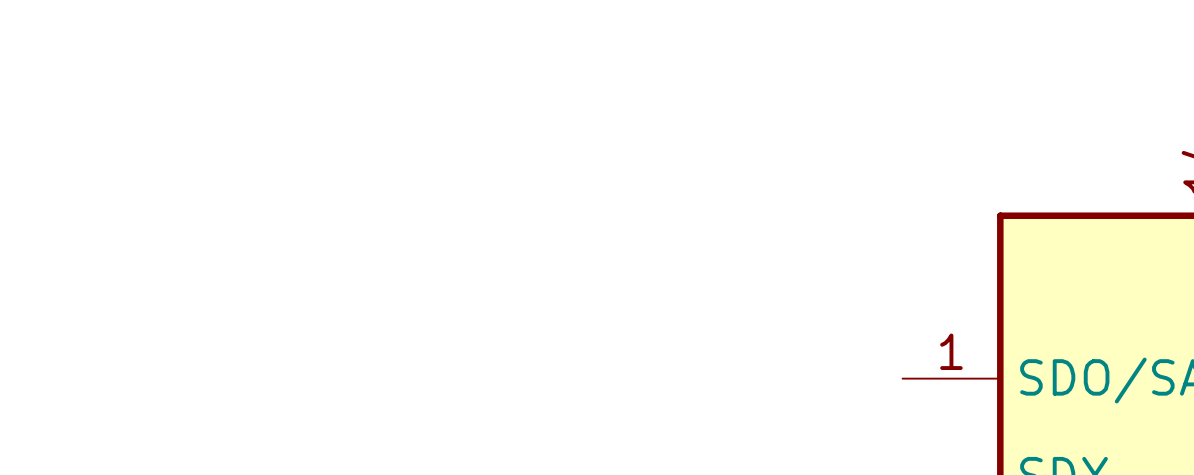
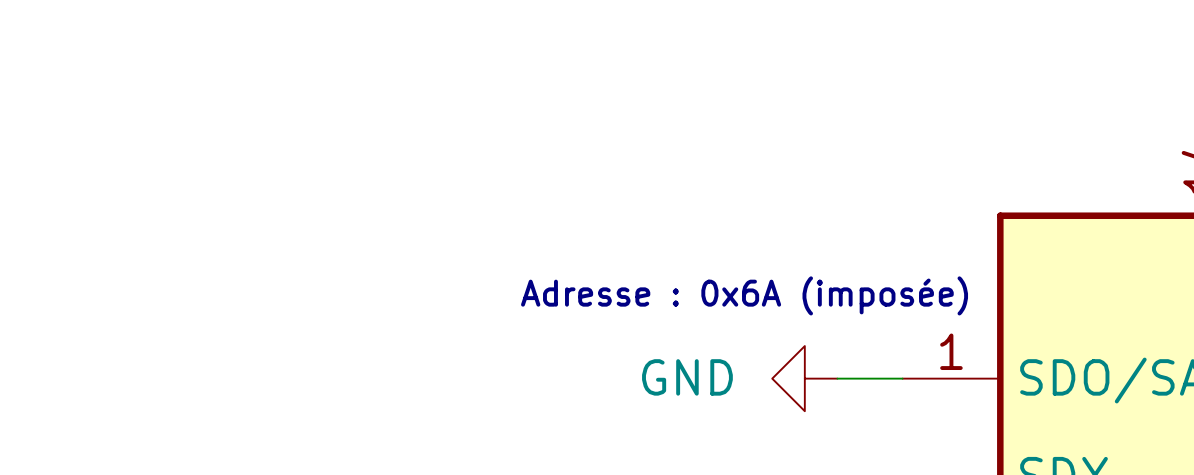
text: none -> Adresse : 0x6A (imposée) (744, 295)
power symbol: none -> GND (804, 378)
wire: none -> (837, 378) (902, 378)

